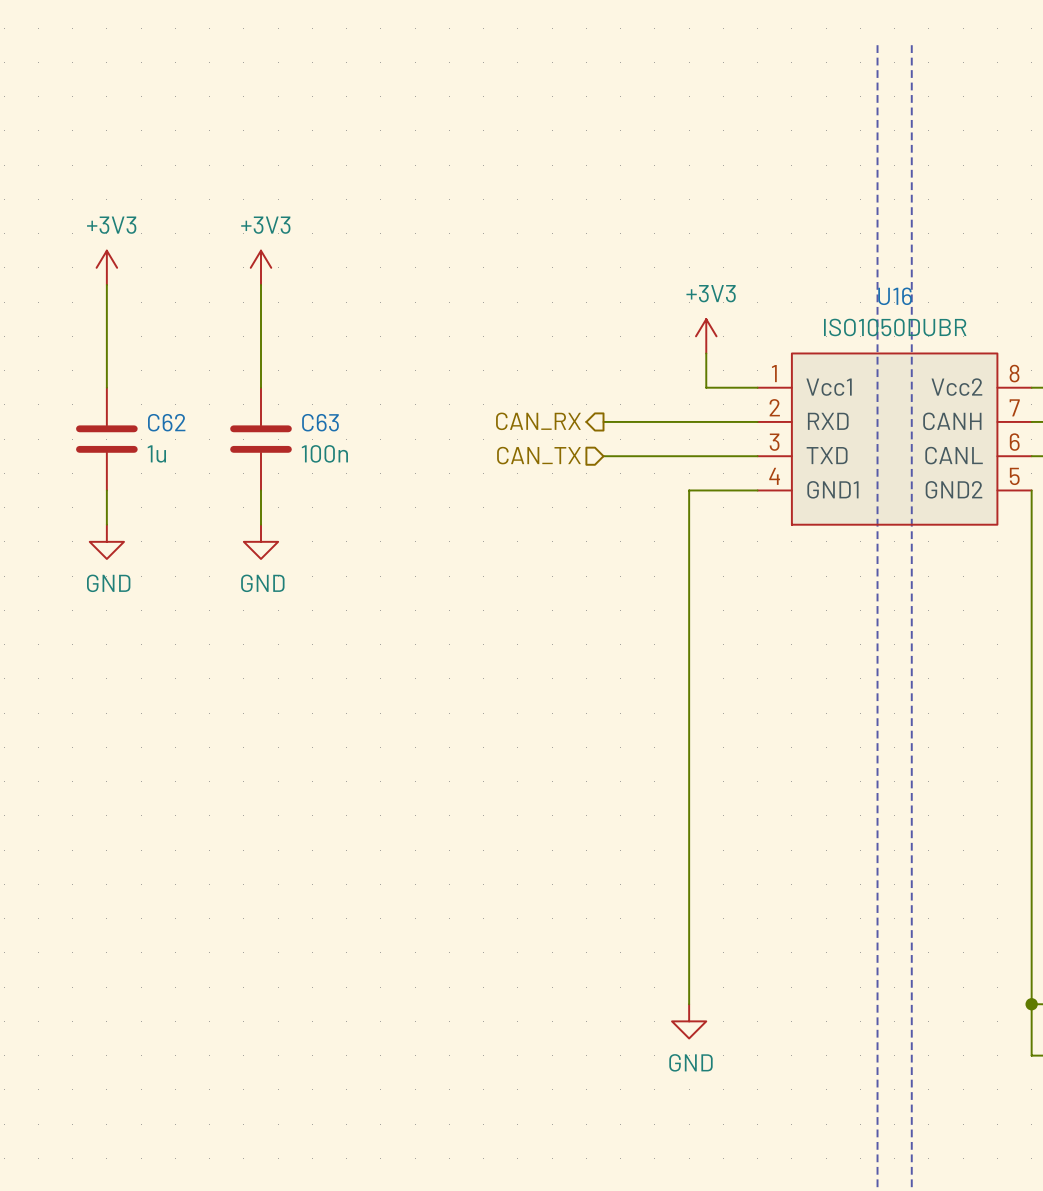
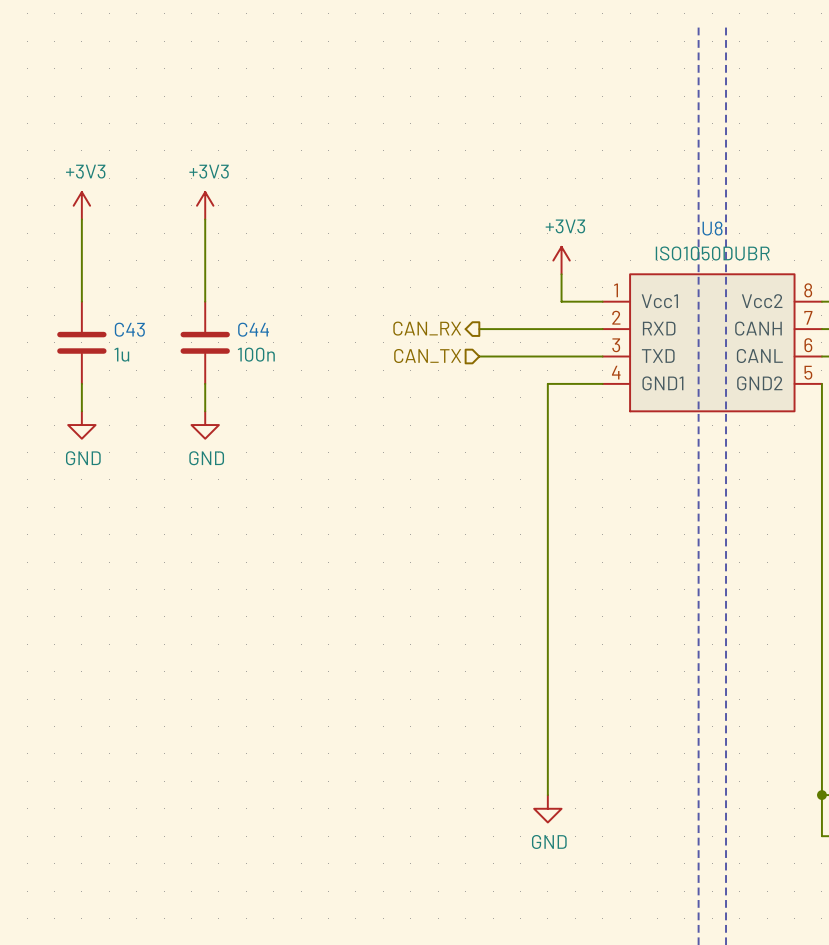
U16 name: U16 (895, 296) -> U8 (712, 228)
C62 name: C62 (166, 422) -> C43 (129, 329)
C63 name: C63 (320, 422) -> C44 (253, 329)

